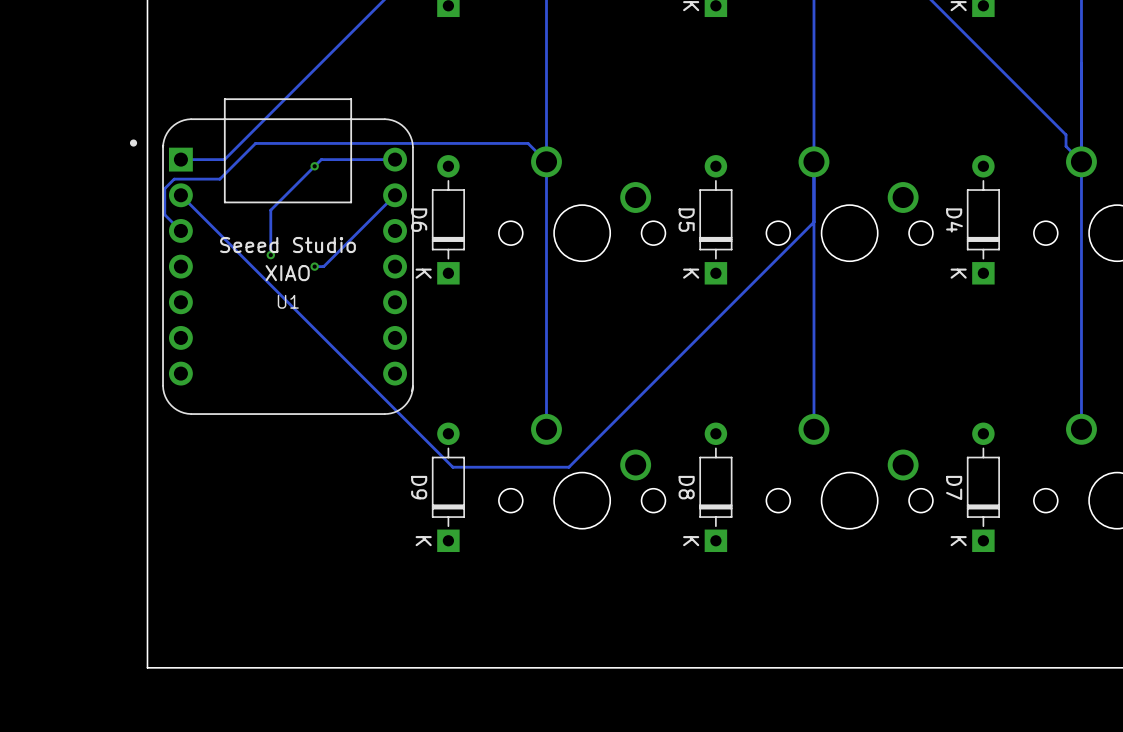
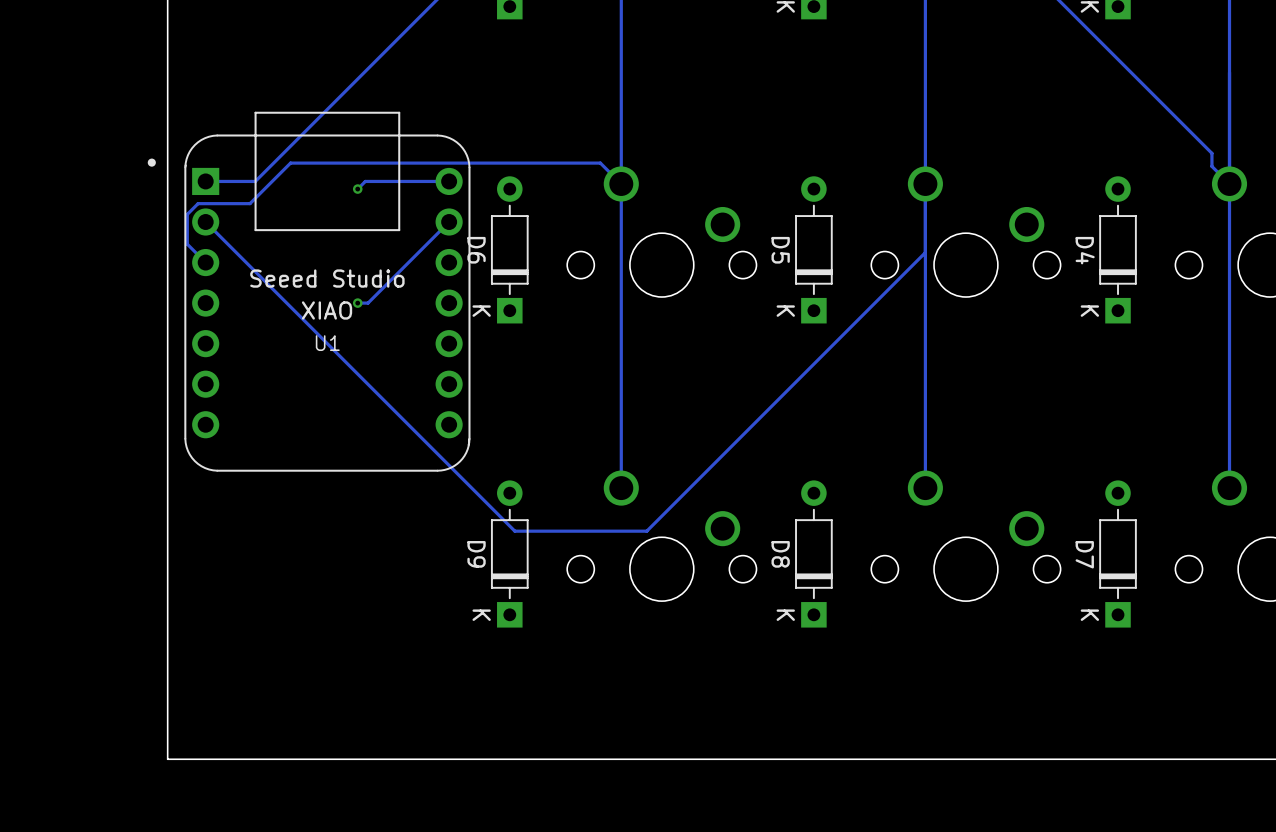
track: (314, 166) (270, 210) (270, 255) -> none
via: (270, 255) -> none

